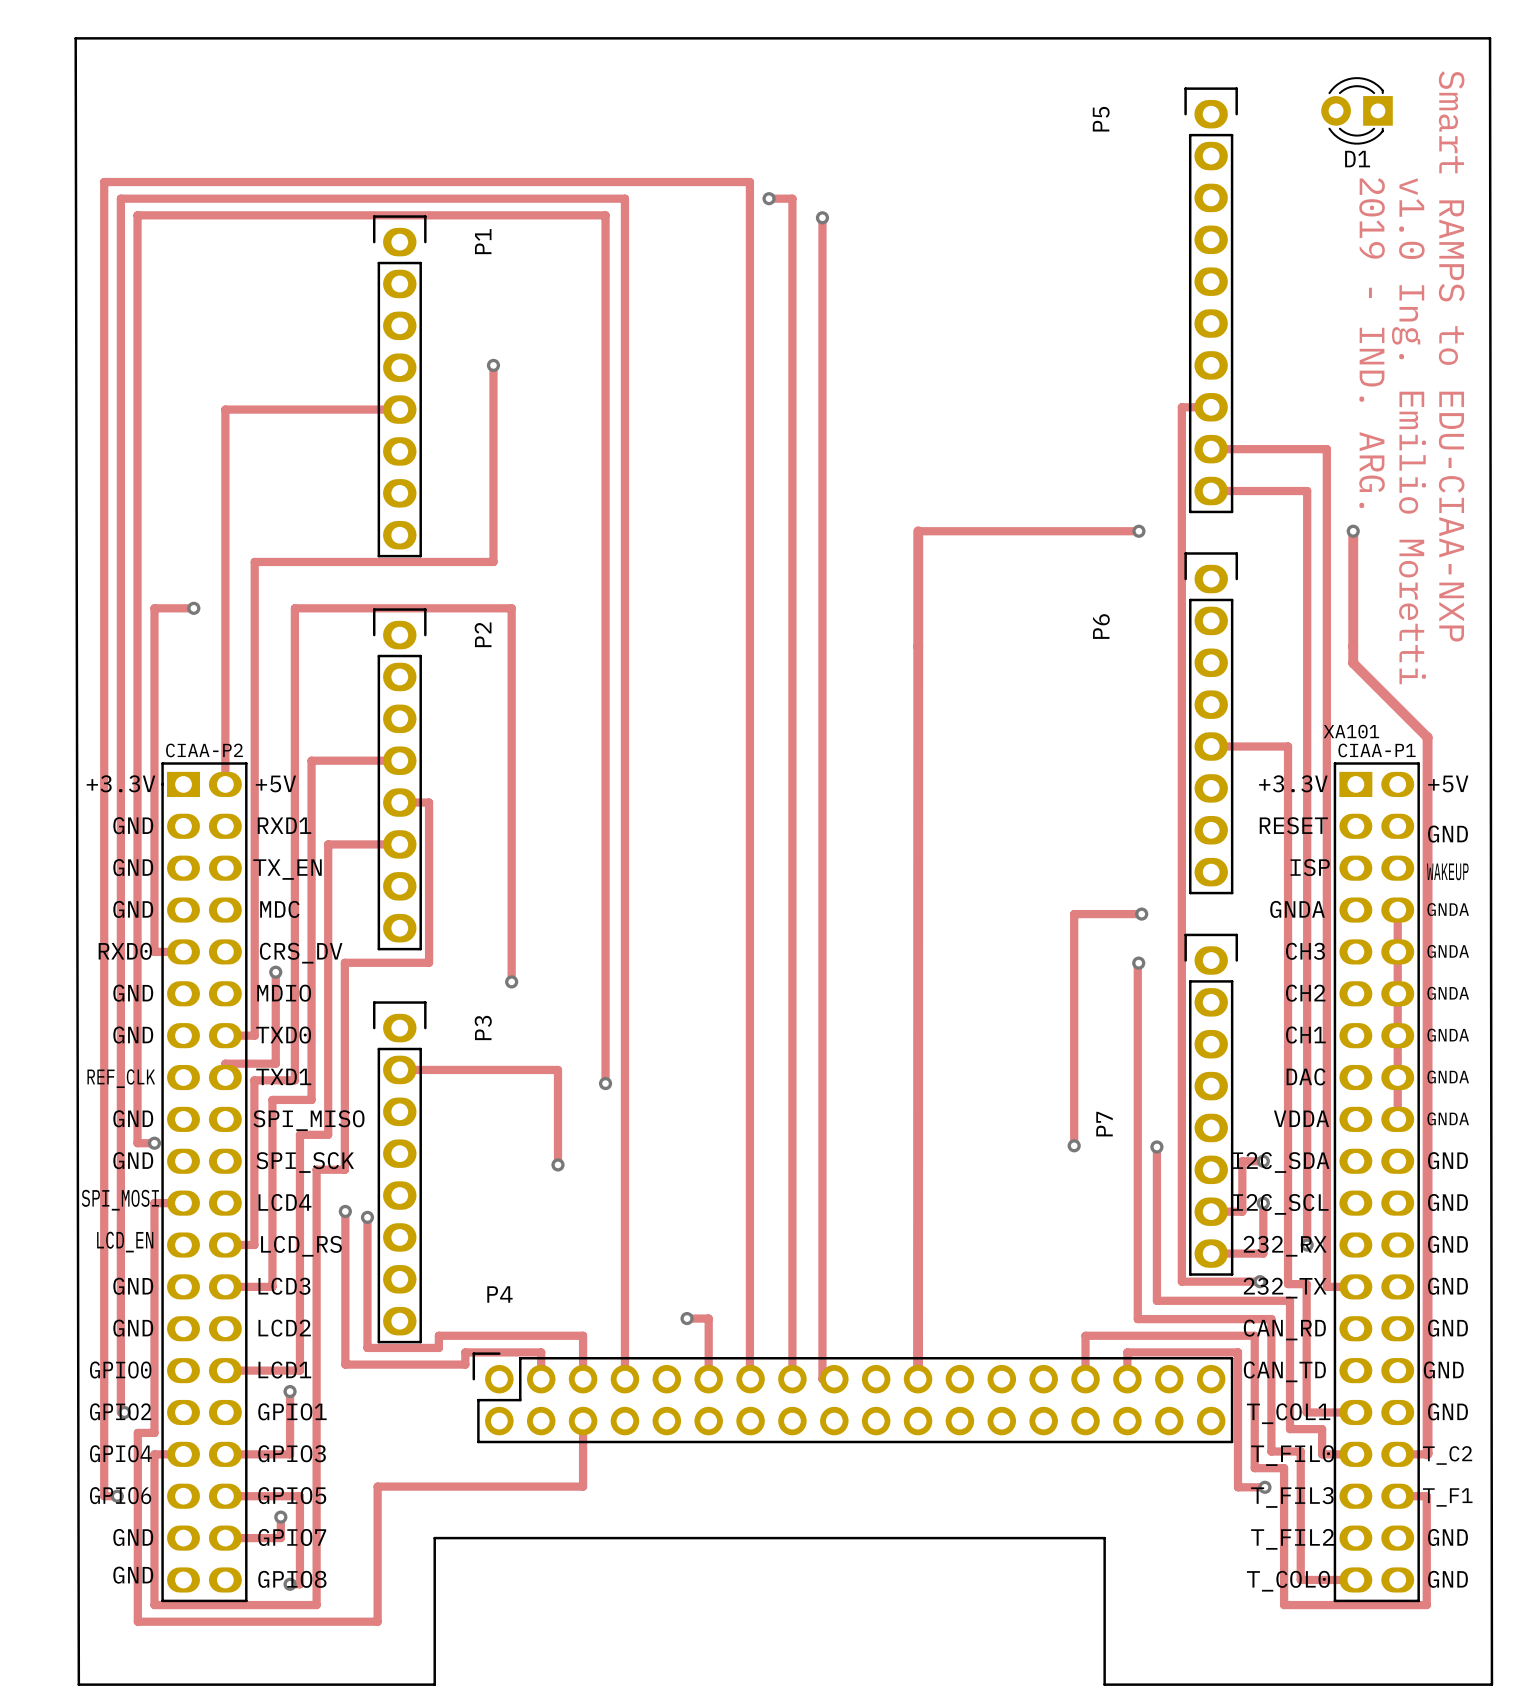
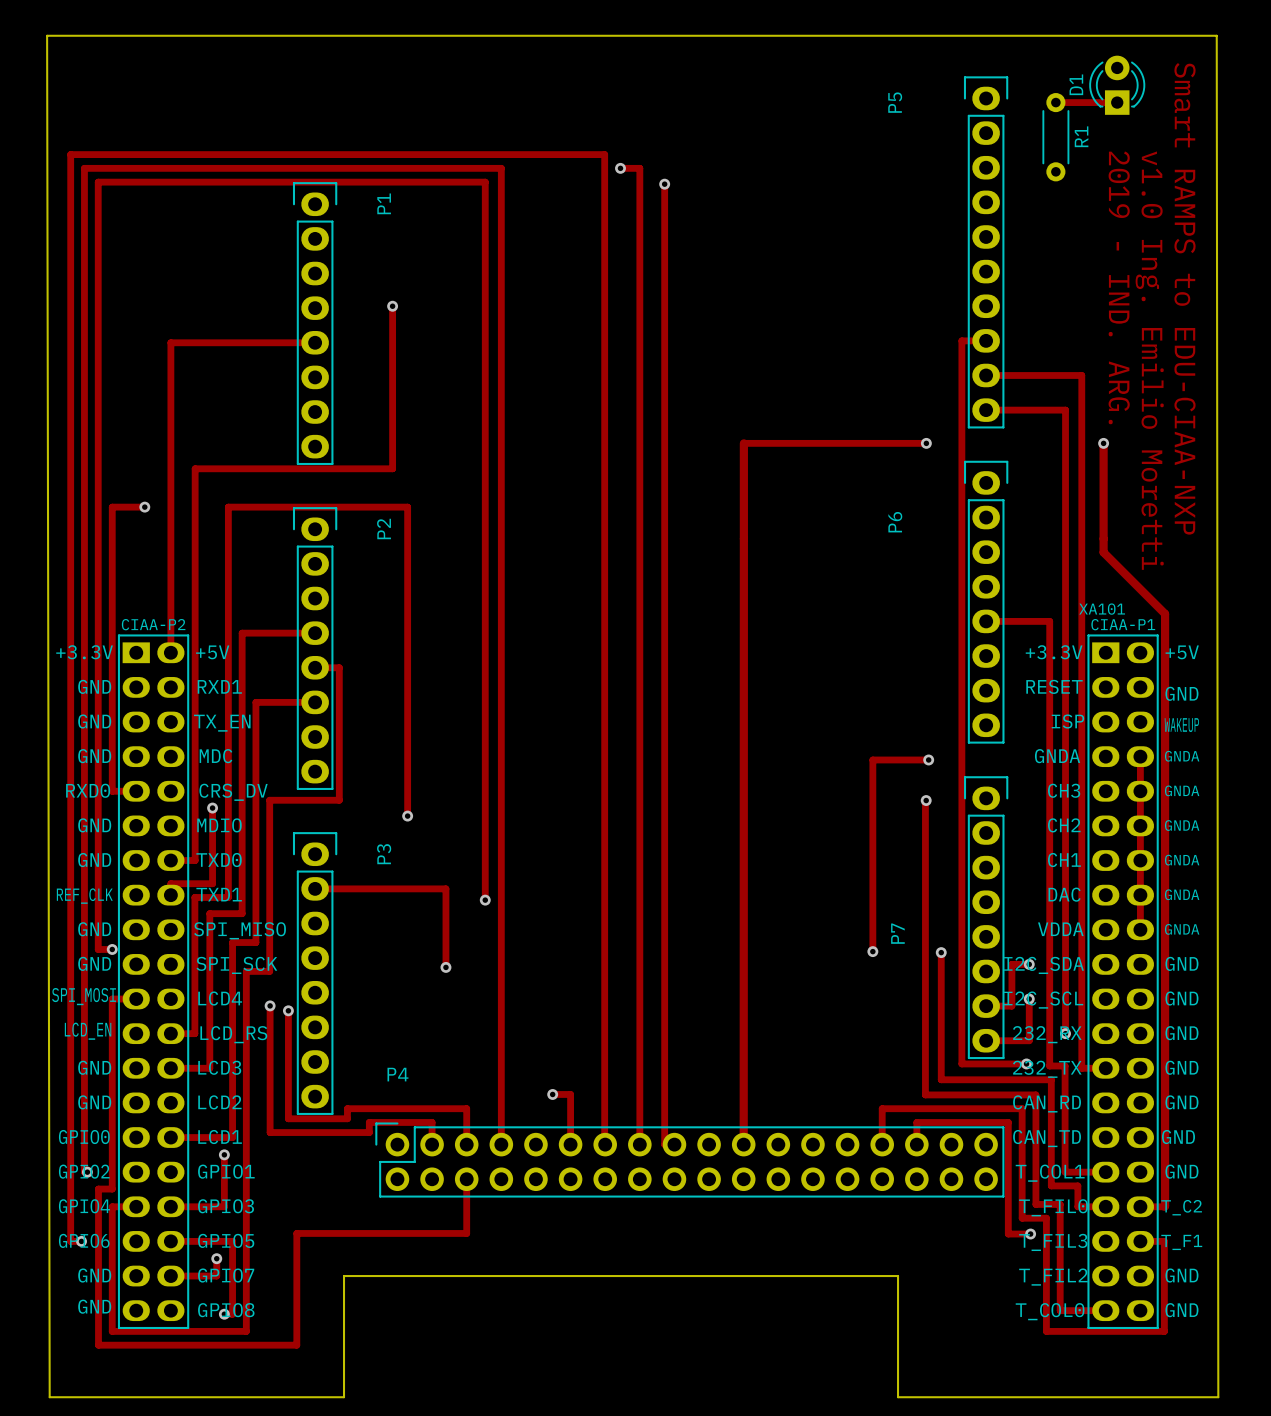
D1 rotation: 0° (1357, 110) -> 90° clockwise (1117, 85)
track: none -> (1055, 102) (1117, 102)
R1: none -> (1055, 137)

